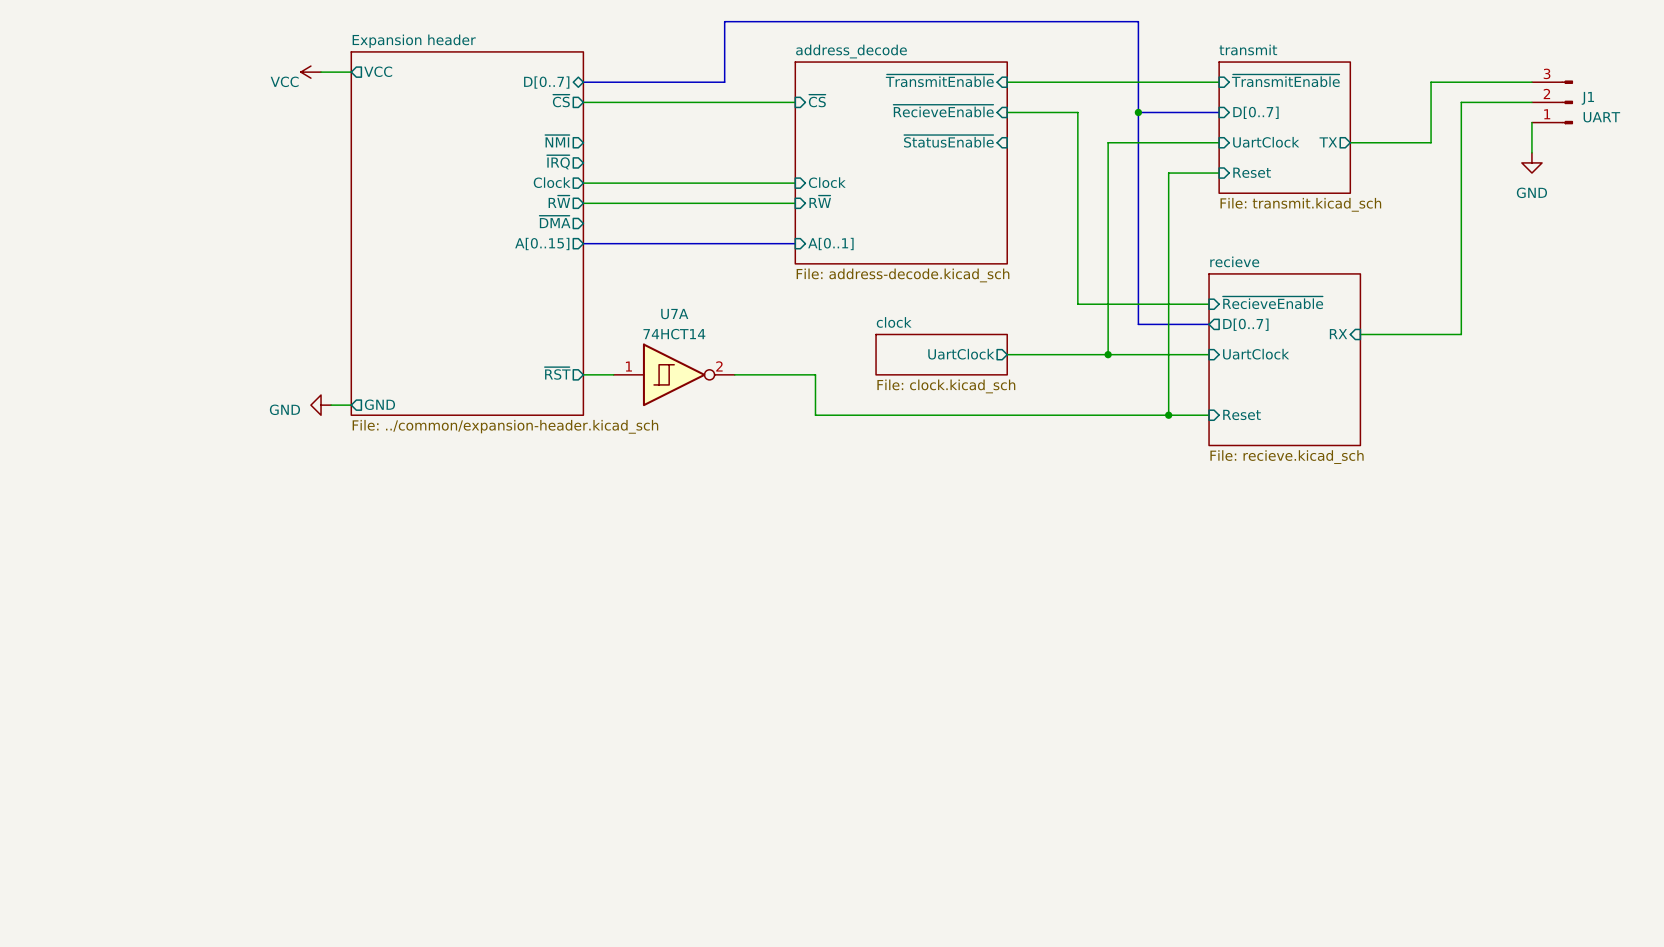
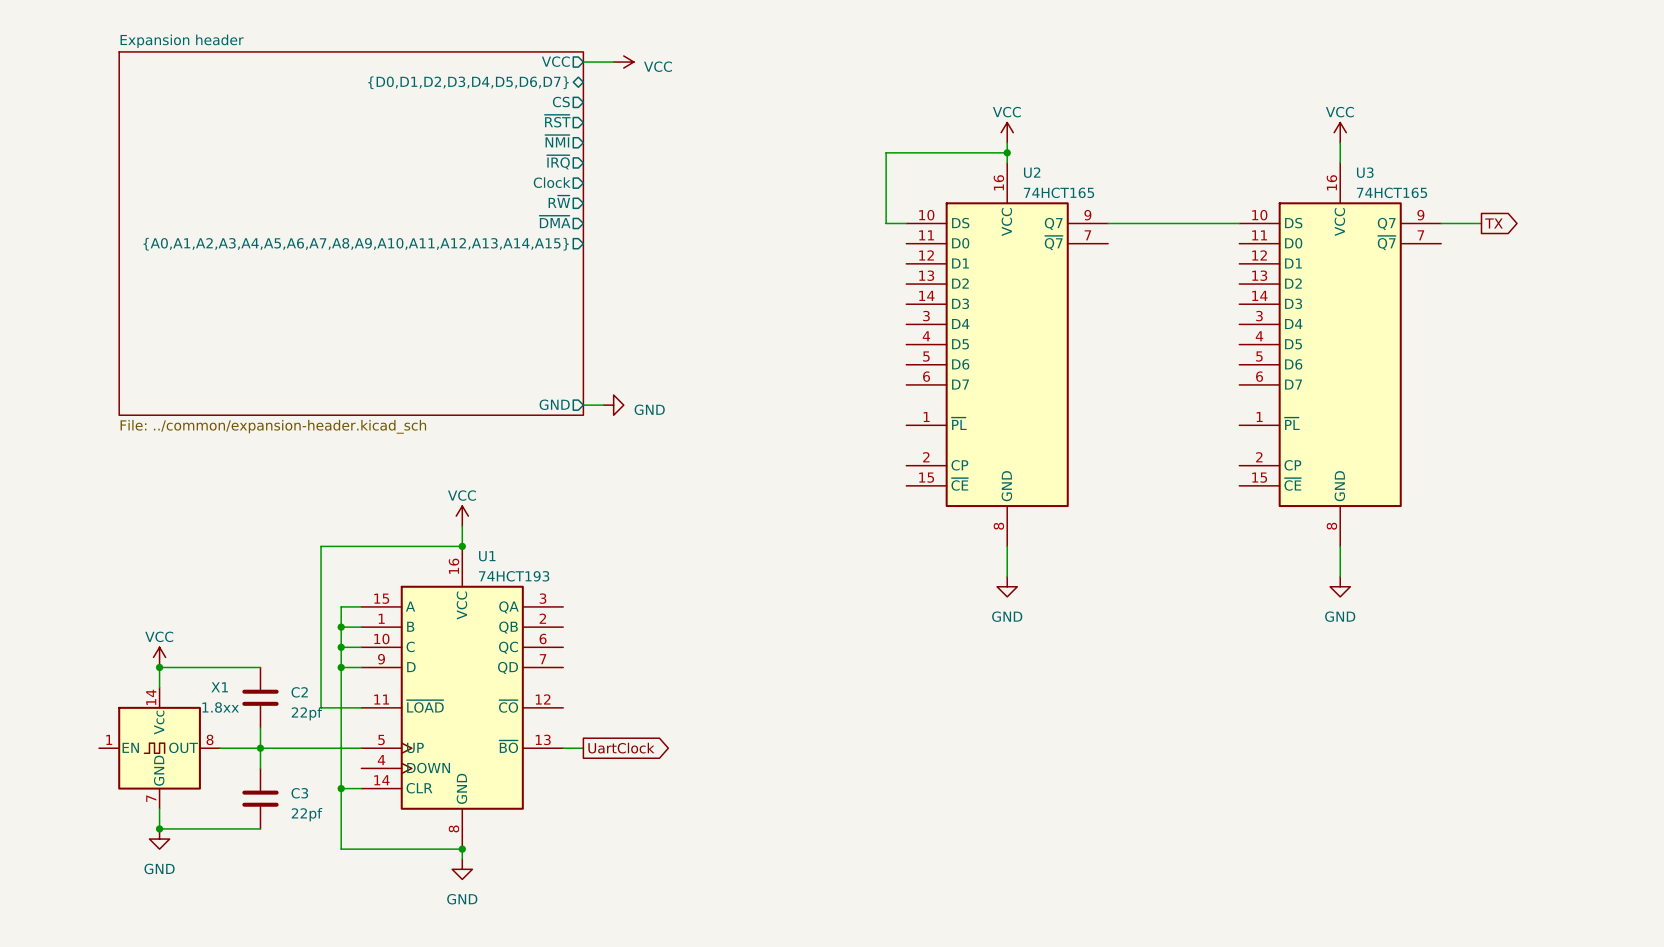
sheet pin: none -> VCC (555, 61)
wire: none -> (583, 62) (613, 62)
power symbol: none -> VCC (623, 62)
sheet pin: VCC (378, 71) -> none
power symbol: VCC (310, 72) -> none
wire: (321, 72) (351, 72) -> none
sheet pin: ~{TransmitEnable} (939, 80) -> none
sheet pin: ~{TransmitEnable} (1285, 80) -> none
sheet pin: D[0..7] (546, 82) -> {D0,D1,D2,D3,D4,D5,D6,D7} (468, 82)
bus: (583, 82) (724, 82) (724, 21) (1138, 21) (1138, 324) (1209, 324) -> none
wire: (1007, 82) (1219, 82) -> none
wire: (1531, 82) (1431, 82) (1431, 142) (1350, 142) -> none
sheet pin: ~{CS} (561, 100) -> CS (561, 102)
sheet pin: ~{CS} (817, 100) -> none
wire: (583, 102) (795, 102) -> none
wire: (1531, 102) (1461, 102) (1461, 334) (1360, 334) -> none
J1: UART (1552, 102) -> none
sheet pin: ~{RecieveEnable} (943, 111) -> none
wire: (1007, 112) (1077, 112) (1077, 304) (1209, 304) -> none
bus: (1138, 112) (1219, 112) -> none
junction: (1138, 112) -> none
sheet pin: D[0..7] (1255, 112) -> none
sheet pin: none -> ~{RST} (557, 121)
wire: (1531, 122) (1531, 152) -> none
sheet transmit: File: transmit.kicad_sch (1284, 127) -> none
power symbol: none -> VCC (1007, 132)
power symbol: none -> VCC (1340, 132)
sheet pin: ~{StatusEnable} (948, 141) -> none
wire: (1219, 142) (1108, 142) (1108, 354) -> none
sheet pin: UartClock (1266, 142) -> none
sheet pin: TX (1328, 142) -> none
wire: none -> (1340, 142) (1340, 162)
wire: none -> (1007, 152) (886, 152) (886, 223) (906, 223)
junction: none -> (1007, 152)
sheet address_decode: File: address-decode.kicad_sch (901, 162) -> none
power symbol: GND (1531, 162) -> none
sheet pin: Reset (1252, 172) -> none
wire: (1219, 173) (1168, 173) (1168, 415) -> none
sheet pin: Clock (827, 182) -> none
wire: (583, 183) (795, 183) -> none
sheet pin: R~{W} (820, 201) -> none
wire: (583, 203) (795, 203) -> none
wire: none -> (1108, 223) (1239, 223)
wire: none -> (1441, 223) (1481, 223)
global label: none -> TX (1494, 223)
sheet Expansion header: none -> File: ../common/expansion-header.kicad_sch (351, 233)
sheet Expansion header: File: ../common/expansion-header.kicad_sch (467, 233) -> none
sheet pin: A[0..15] (542, 243) -> {A0,A1,A2,A3,A4,A5,A6,A7,A8,A9,A10,A11,A12,A13,A14,A15} (356, 244)
bus: (583, 243) (795, 243) -> none
sheet pin: A[0..1] (830, 243) -> none
sheet pin: ~{RecieveEnable} (1272, 302) -> none
sheet pin: D[0..7] (1245, 324) -> none
sheet pin: RX (1338, 334) -> none
sheet clock: File: clock.kicad_sch (941, 354) -> none
sheet pin: UartClock (961, 354) -> none
wire: (1007, 354) (1209, 354) -> none
U2: none -> 74HCT165 (1007, 354)
junction: (1108, 354) -> none
sheet pin: UartClock (1256, 354) -> none
U3: none -> 74HCT165 (1340, 354)
sheet recieve: File: recieve.kicad_sch (1284, 359) -> none
sheet pin: ~{RST} (557, 373) -> none
wire: (583, 374) (613, 374) -> none
U7A: 74HCT14 (674, 374) -> none
wire: (734, 374) (815, 374) (815, 415) (1209, 415) -> none
sheet pin: GND (379, 404) -> none
sheet pin: none -> GND (554, 404)
power symbol: GND (321, 405) -> none
wire: (331, 405) (351, 405) -> none
wire: none -> (583, 405) (603, 405)
power symbol: none -> GND (613, 405)
sheet pin: Reset (1242, 414) -> none
junction: (1168, 415) -> none
power symbol: none -> VCC (462, 516)
wire: none -> (462, 526) (462, 546) (321, 546) (321, 707) (361, 707)
junction: none -> (462, 546)
wire: none -> (1007, 546) (1007, 576)
wire: none -> (1340, 546) (1340, 576)
power symbol: none -> GND (1007, 586)
power symbol: none -> GND (1340, 586)
wire: none -> (361, 606) (341, 606) (341, 849) (462, 849) (462, 859)
wire: none -> (341, 627) (361, 627)
junction: none -> (341, 627)
wire: none -> (341, 647) (361, 647)
junction: none -> (341, 647)
power symbol: none -> VCC (159, 657)
junction: none -> (159, 667)
wire: none -> (260, 667) (159, 667) (159, 687)
wire: none -> (341, 667) (361, 667)
junction: none -> (341, 667)
C2: none -> 22pf (260, 697)
U1: none -> 74HCT193 (462, 697)
wire: none -> (260, 728) (260, 768)
X1: none -> 1.8xx (159, 748)
wire: none -> (220, 748) (361, 748)
junction: none -> (260, 748)
wire: none -> (563, 748) (583, 748)
global label: none -> UartClock (621, 748)
wire: none -> (341, 788) (361, 788)
junction: none -> (341, 788)
C3: none -> 22pf (260, 798)
wire: none -> (159, 808) (159, 828) (260, 828)
junction: none -> (159, 828)
power symbol: none -> GND (159, 839)
junction: none -> (462, 849)
power symbol: none -> GND (462, 869)

